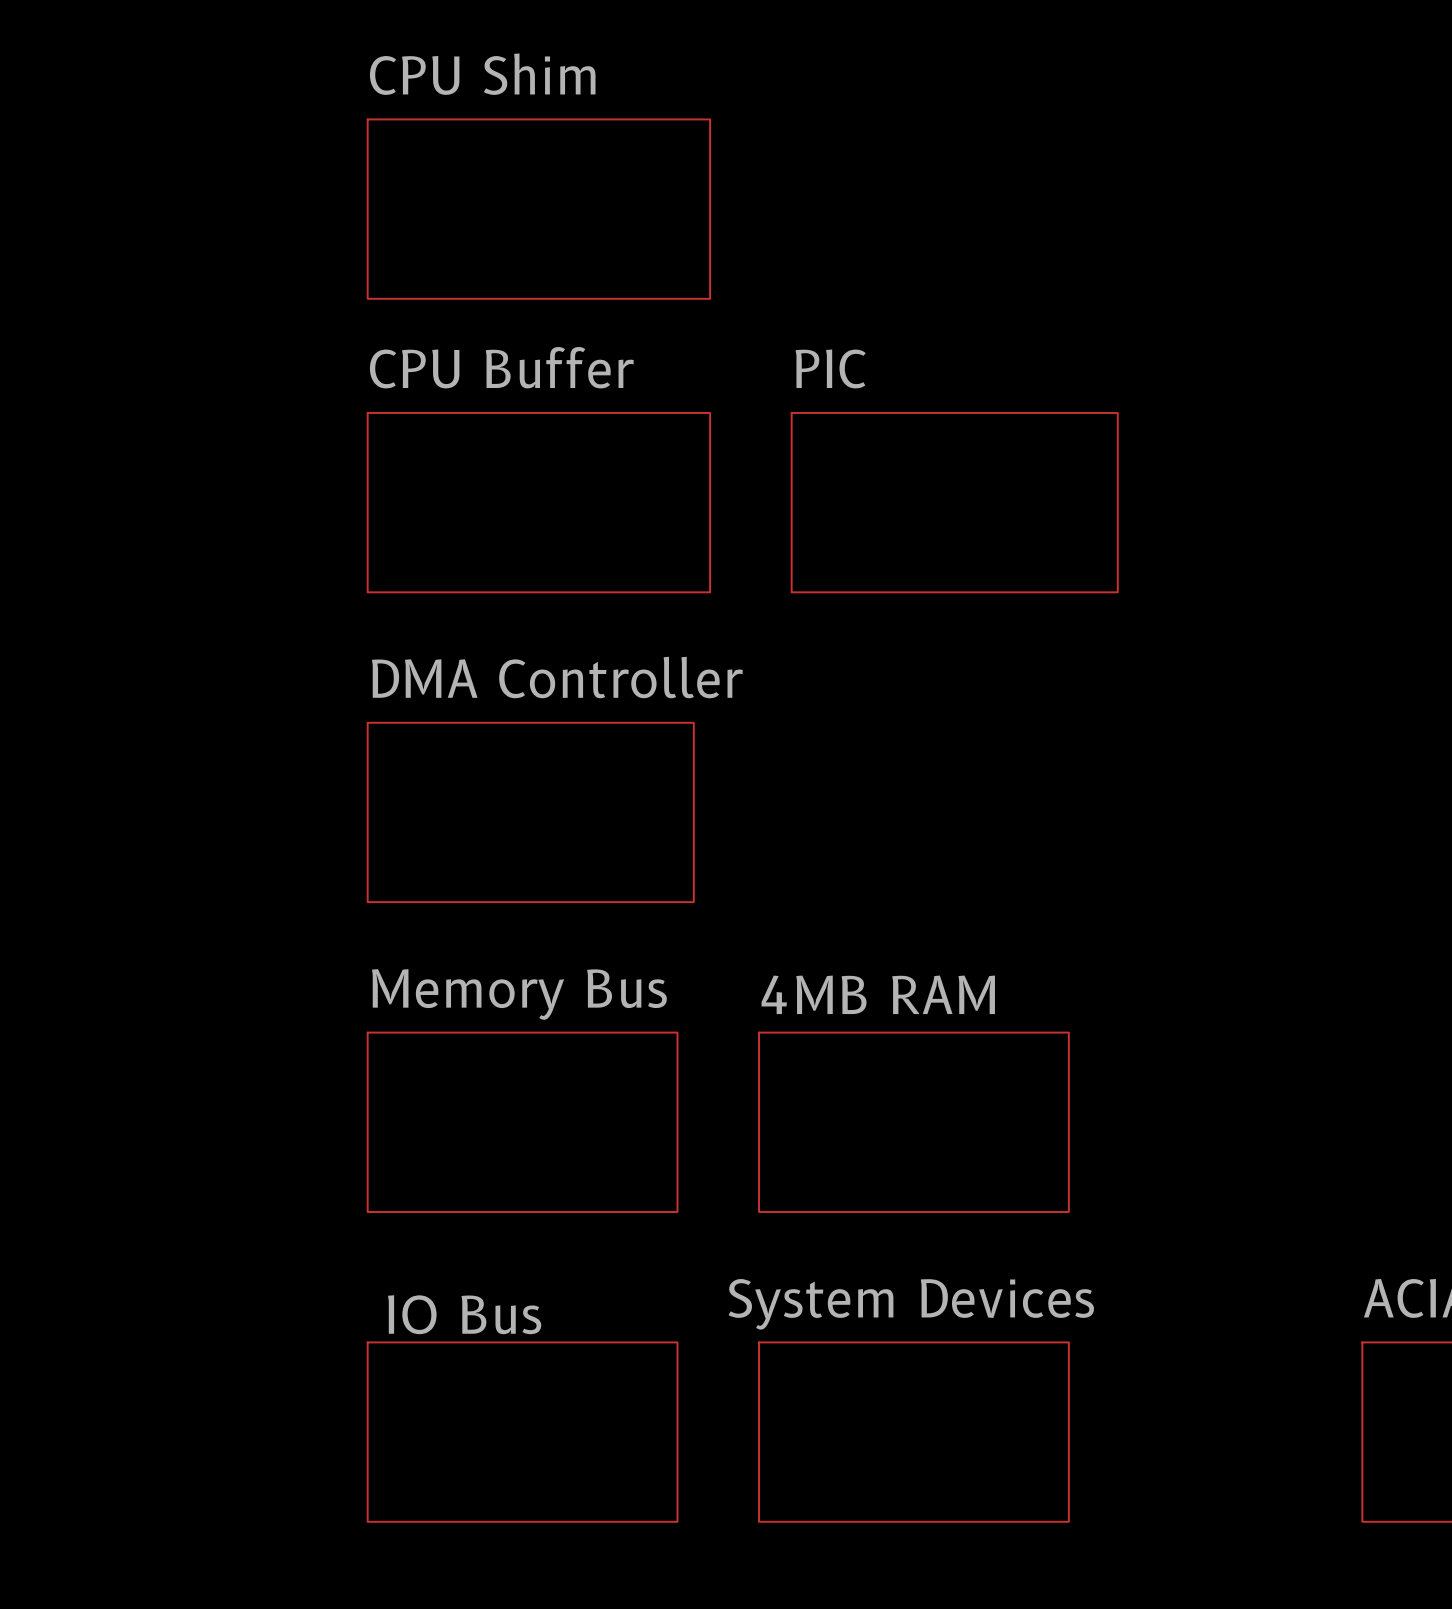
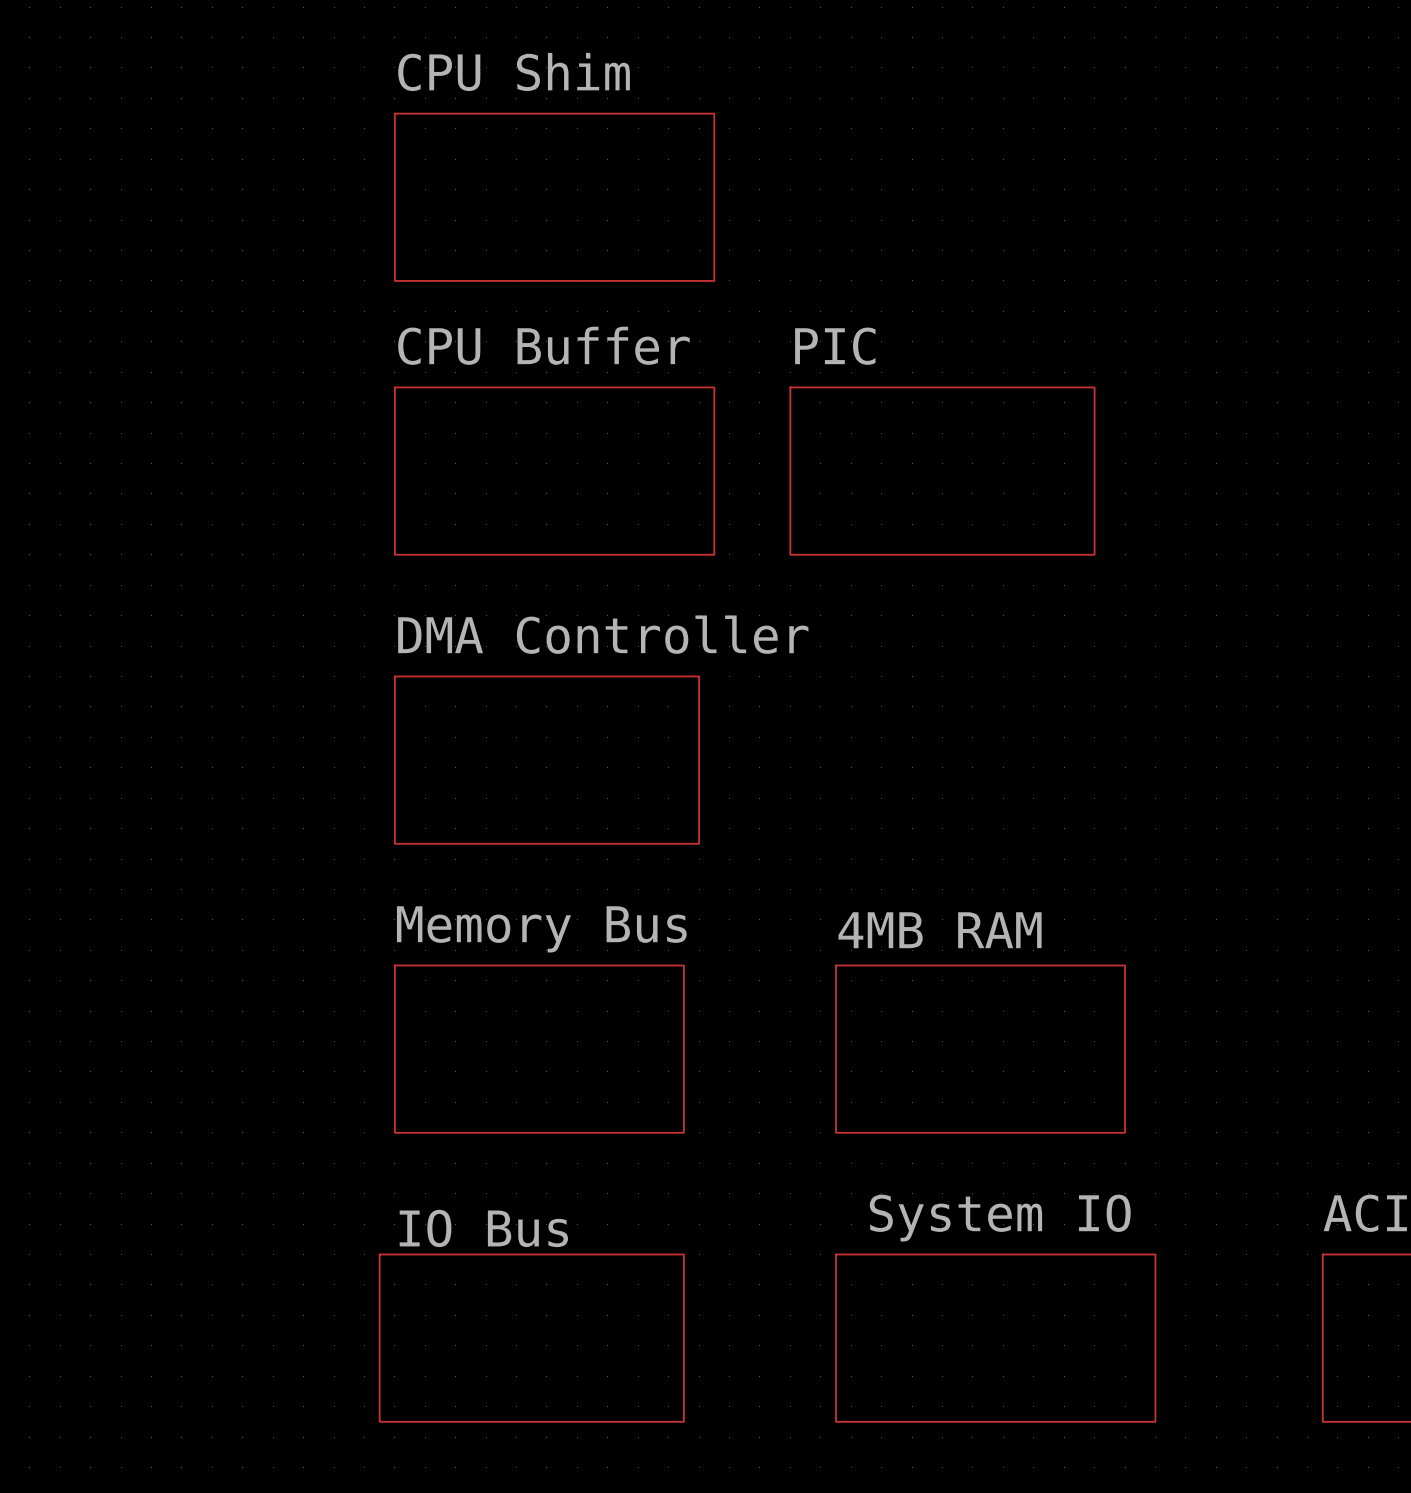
sheet 4MB RAM position: (913, 1122) -> (980, 1049)
sheet IO Bus shape: [366, 1341, 679, 1523] -> [378, 1253, 685, 1423]
sheet System Devices: (913, 1432) -> none
sheet System IO: none -> (995, 1338)

